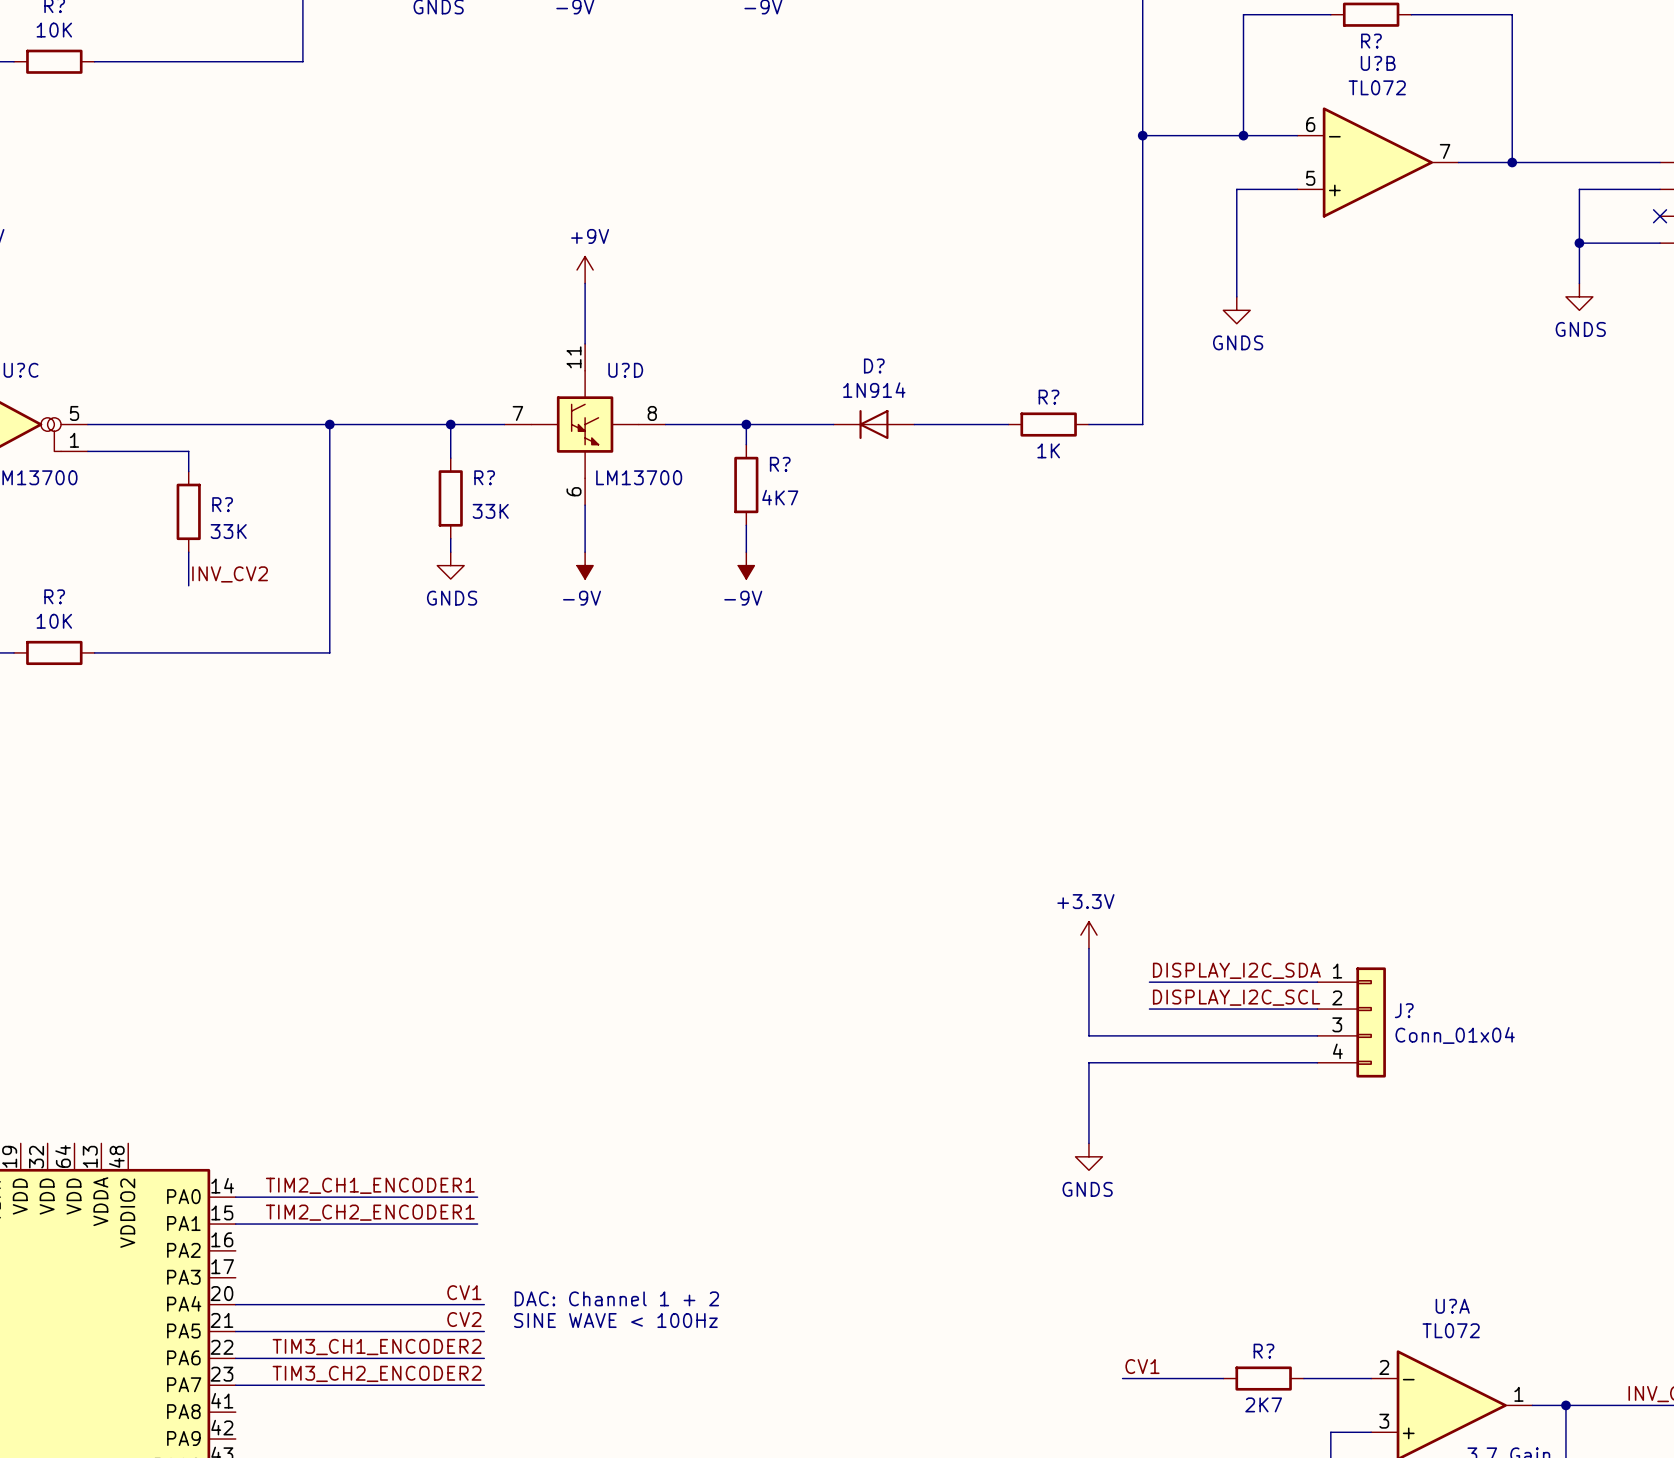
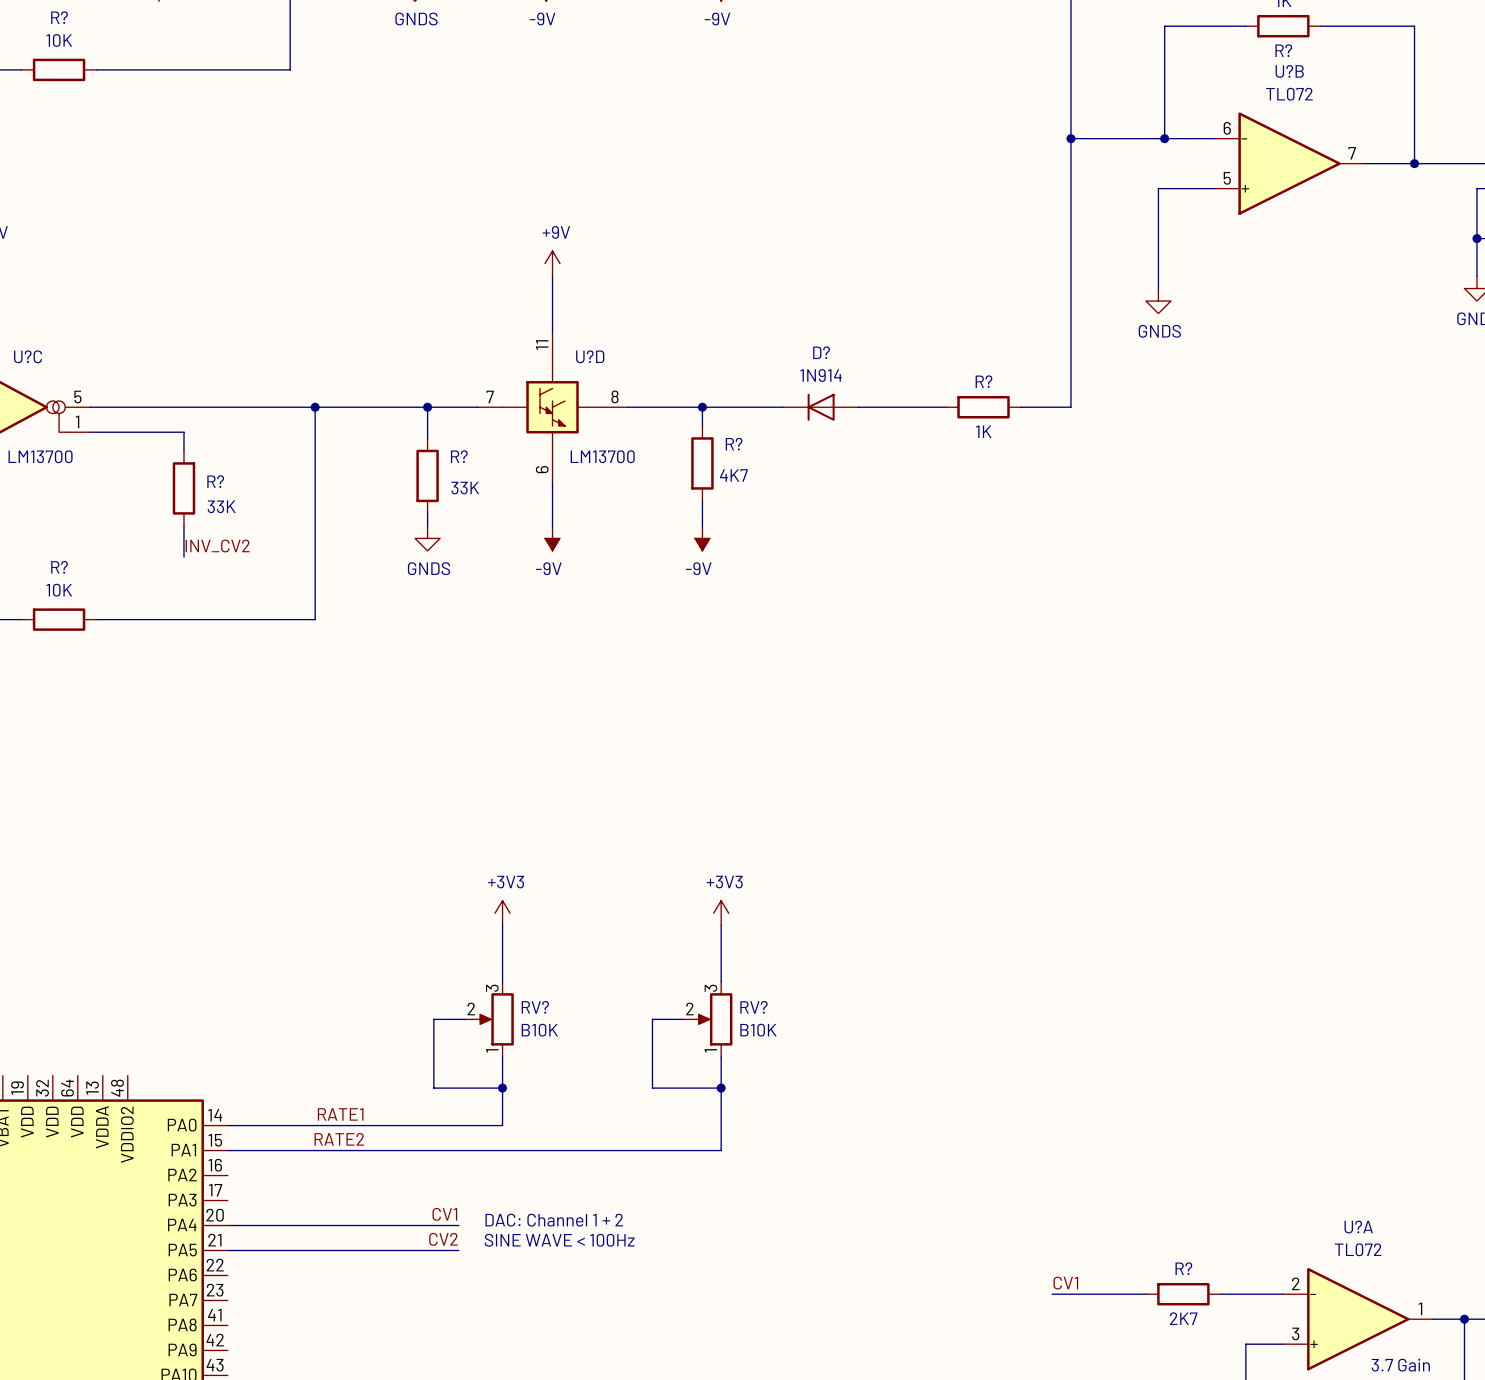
power symbol: +3.3V (1088, 935) -> none
wire: (1088, 948) (1088, 1035) (1317, 1035) -> none
power symbol: none -> +3V3 (502, 913)
power symbol: none -> +3V3 (721, 913)
label: DISPLAY_I2C_SDA (1236, 970) -> none
wire: none -> (502, 925) (502, 981)
wire: none -> (721, 925) (721, 981)
wire: (1149, 982) (1317, 982) -> none
label: DISPLAY_I2C_SCL (1236, 997) -> none
wire: (1149, 1009) (1317, 1009) -> none
J?: Conn_01x04 (1351, 1022) -> none
wire: (1317, 1062) (1088, 1062) (1088, 1143) -> none
wire: none -> (465, 1019) (433, 1019) (433, 1088) (502, 1088)
RV?: none -> B10K (489, 1019)
wire: none -> (683, 1019) (652, 1019) (652, 1088) (721, 1088)
RV?: none -> B10K (708, 1019)
wire: none -> (502, 1056) (502, 1125) (452, 1125)
wire: none -> (721, 1056) (721, 1150) (452, 1150)
junction: none -> (502, 1088)
junction: none -> (721, 1088)
power symbol: GNDS (1088, 1156) -> none
label: none -> RATE1 (340, 1114)
label: TIM2_CH1_ENCODER1 (370, 1185) -> none
label: none -> RATE2 (339, 1139)
label: TIM2_CH2_ENCODER1 (370, 1212) -> none
label: TIM3_CH1_ENCODER2 (377, 1347) -> none
wire: (235, 1358) (484, 1358) -> none
label: TIM3_CH2_ENCODER2 (377, 1373) -> none
wire: (235, 1385) (484, 1385) -> none

